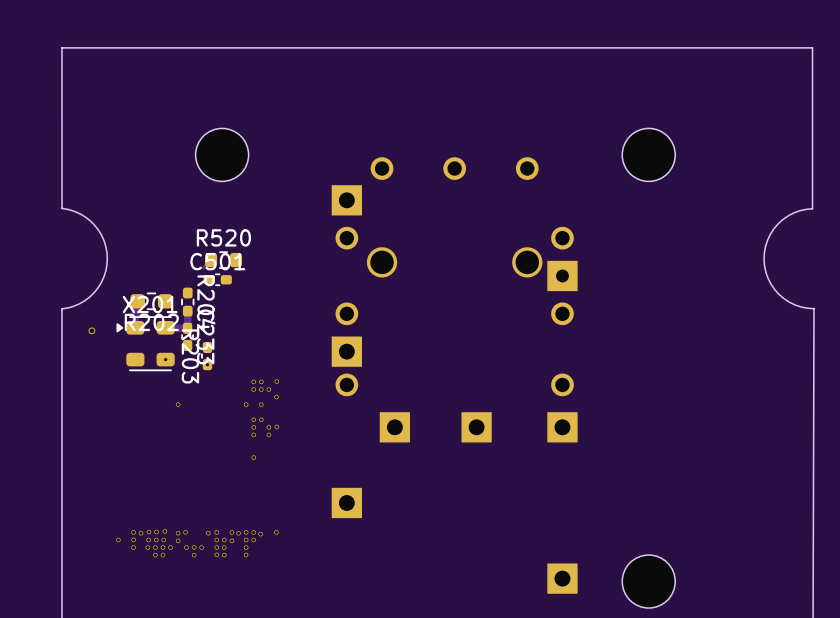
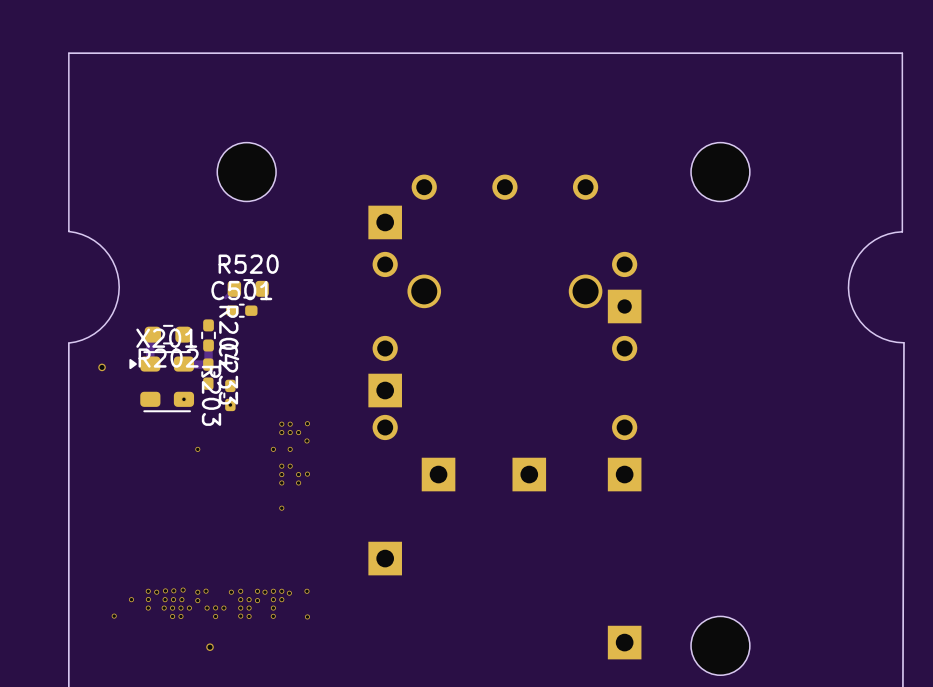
via: none -> (114, 616)
via: none -> (307, 616)
via: none -> (210, 647)

